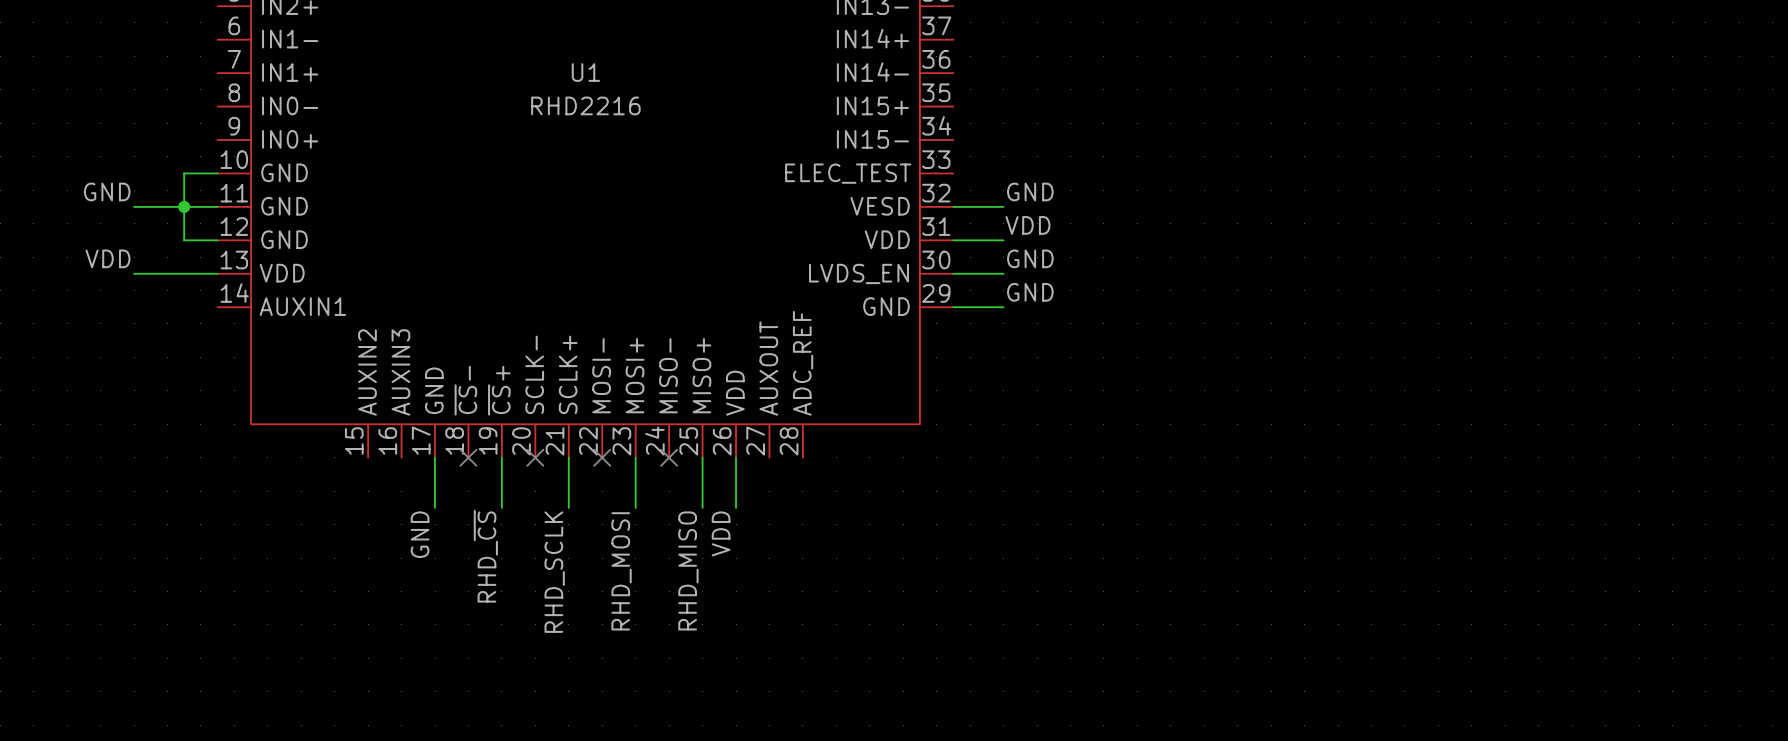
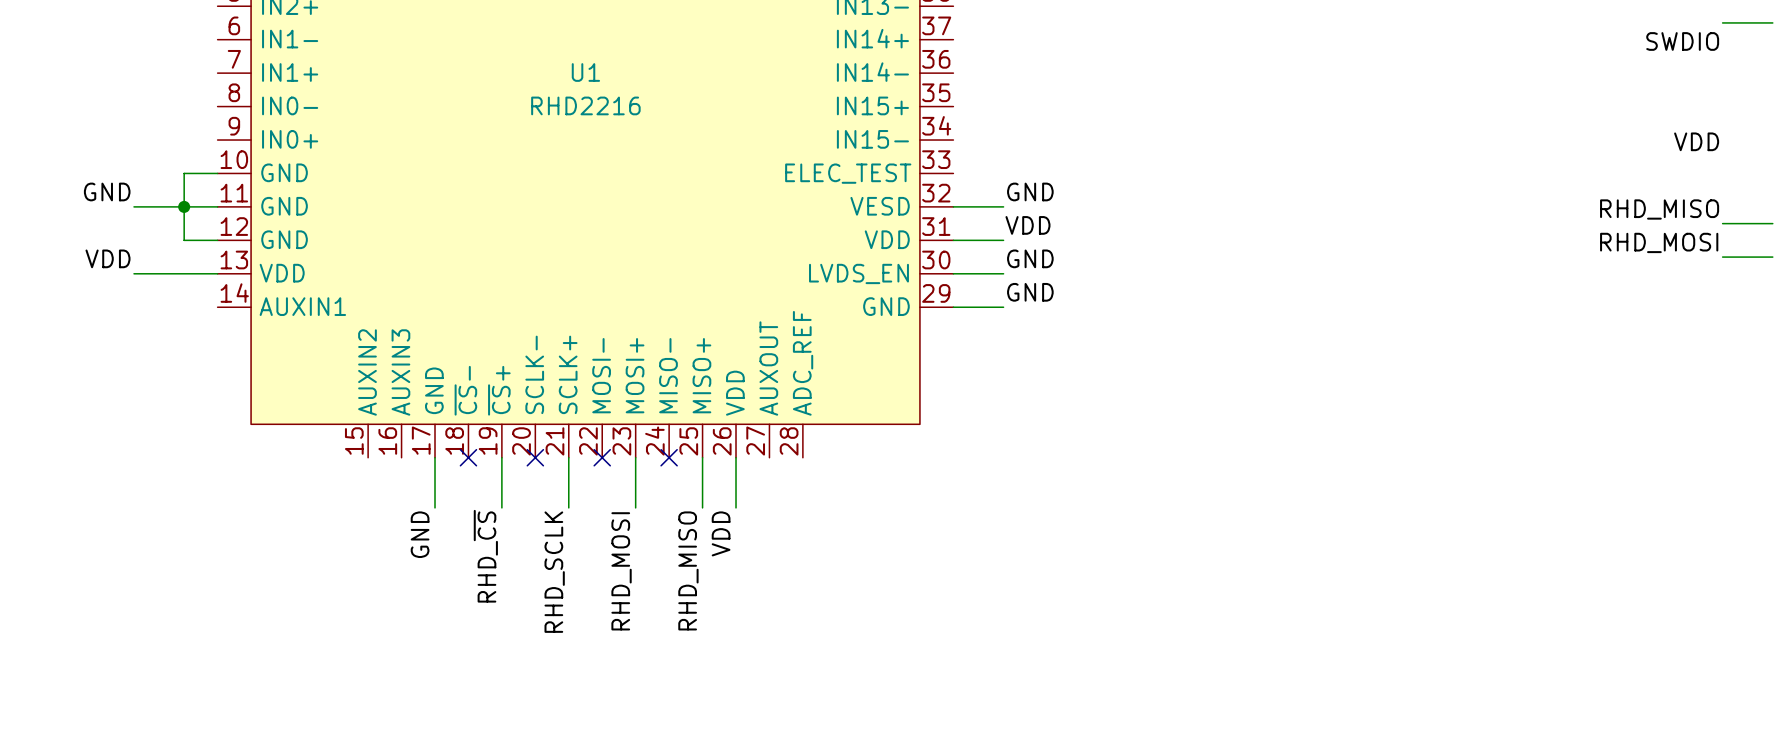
wire: none -> (1722, 22) (1772, 22)
label: none -> SWDIO (1682, 41)
label: none -> VDD (1696, 141)
label: none -> RHD_MISO (1659, 209)
wire: none -> (1722, 223) (1772, 223)
label: none -> RHD_MOSI (1659, 242)
wire: none -> (1722, 257) (1772, 257)

